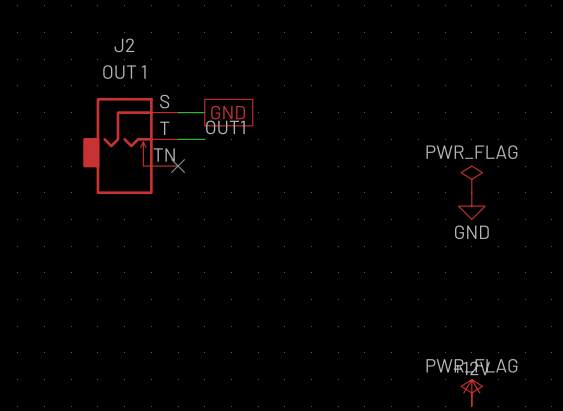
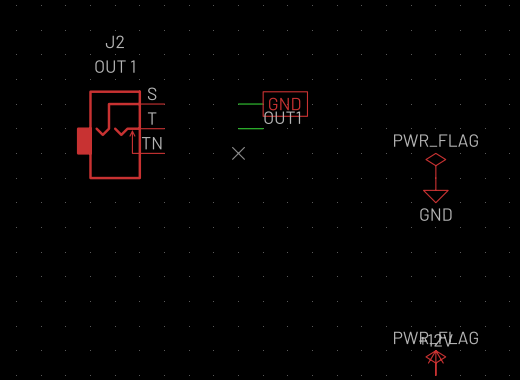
wire: (178, 112) (204, 112) -> (238, 104) (263, 104)
global label position: GND (228, 112) -> GND (284, 104)
label position: OUT1 (225, 127) -> OUT1 (282, 117)
wire: (178, 139) (204, 139) -> (238, 128) (263, 128)
no-connect mark: (178, 166) -> none
no-connect mark: none -> (238, 153)

